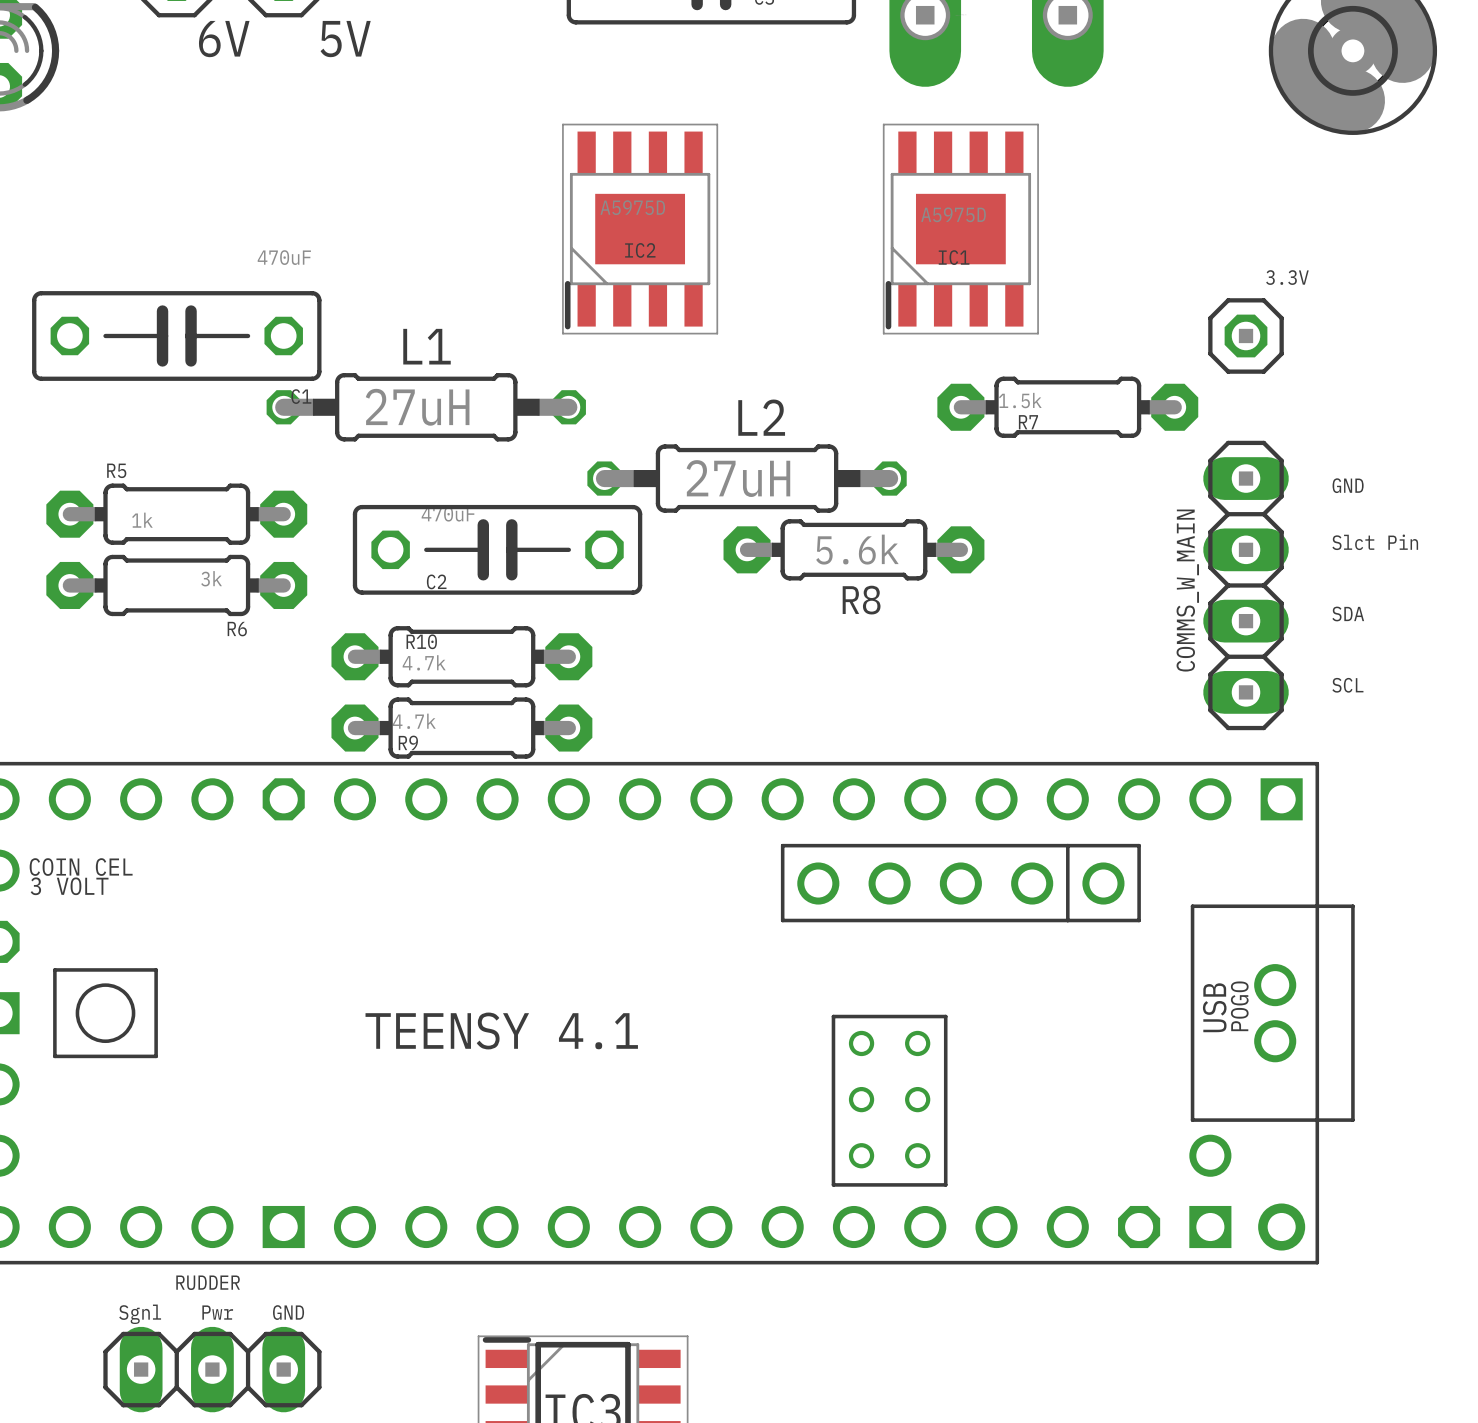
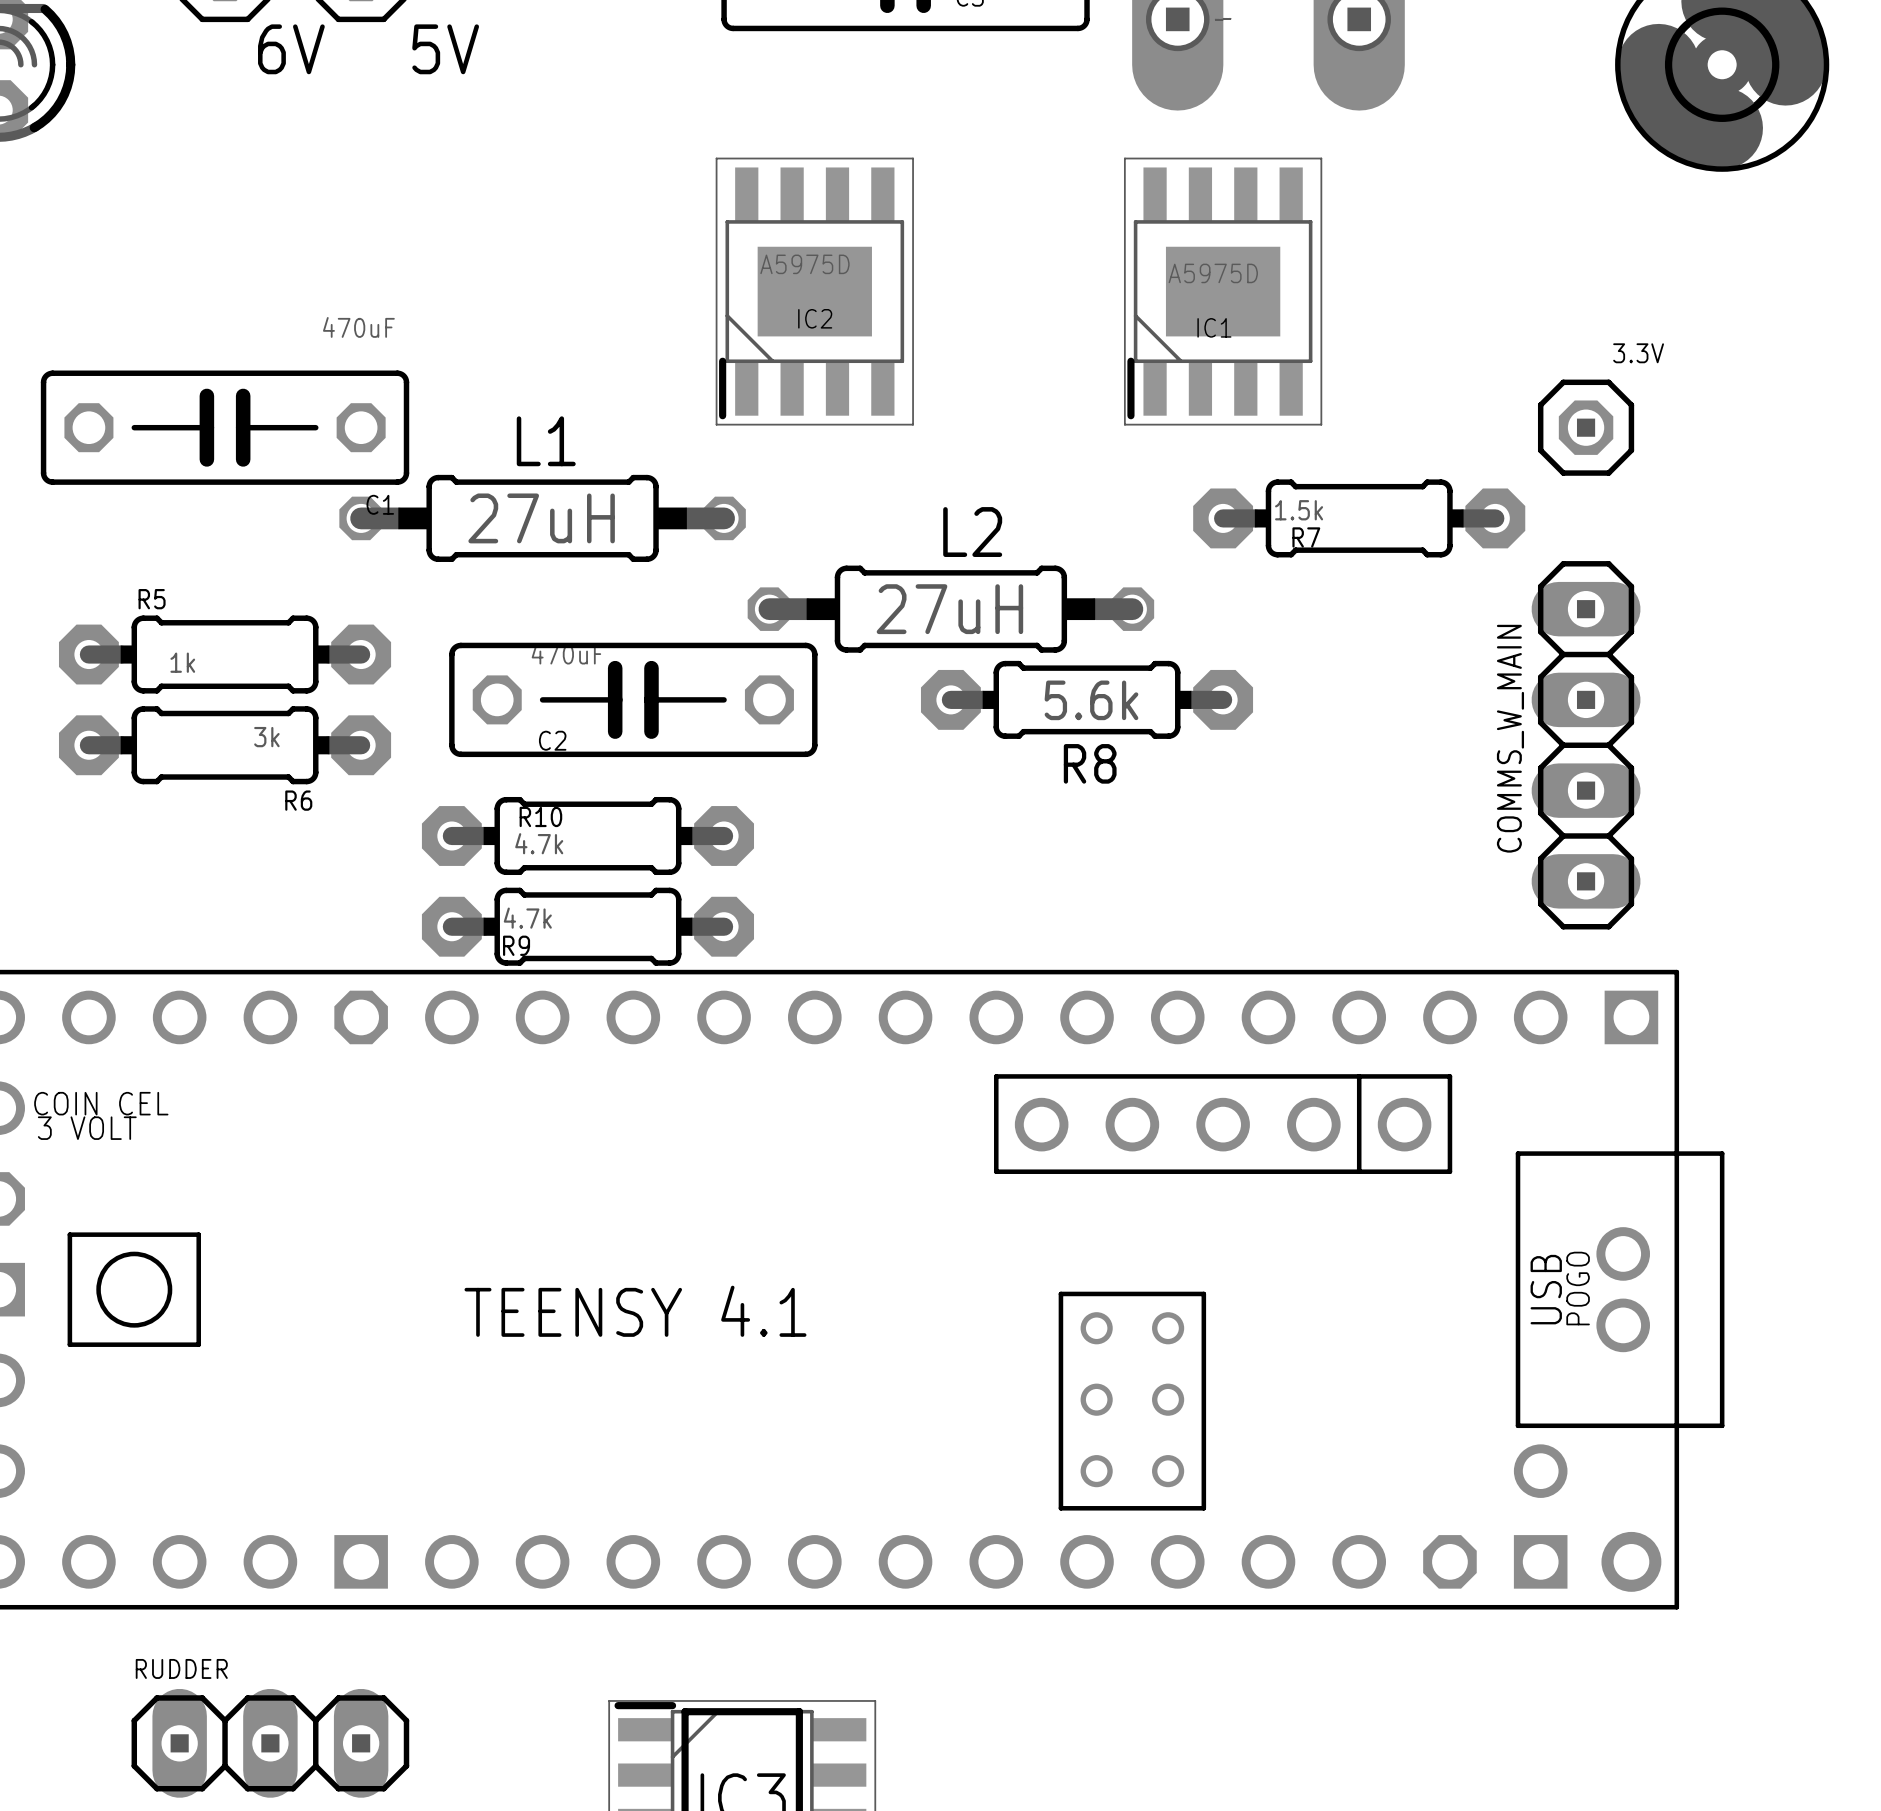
text: GND (1348, 485) -> none
text: Slct Pin (1375, 542) -> none
text: SDA (1348, 613) -> none
text: SCL (1347, 685) -> none
RUDDER name position: RUDDER (208, 1282) -> RUDDER (181, 1668)
text: Pwr (217, 1312) -> none
text: GND (288, 1312) -> none
text: Sgnl (140, 1314) -> none

